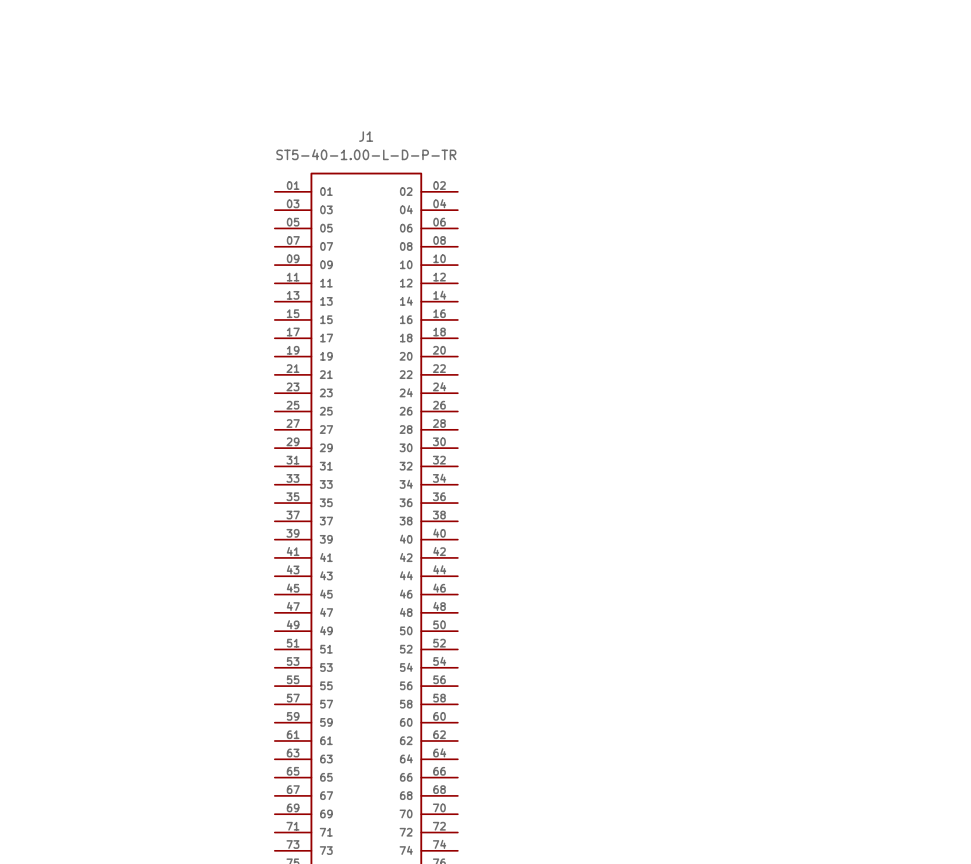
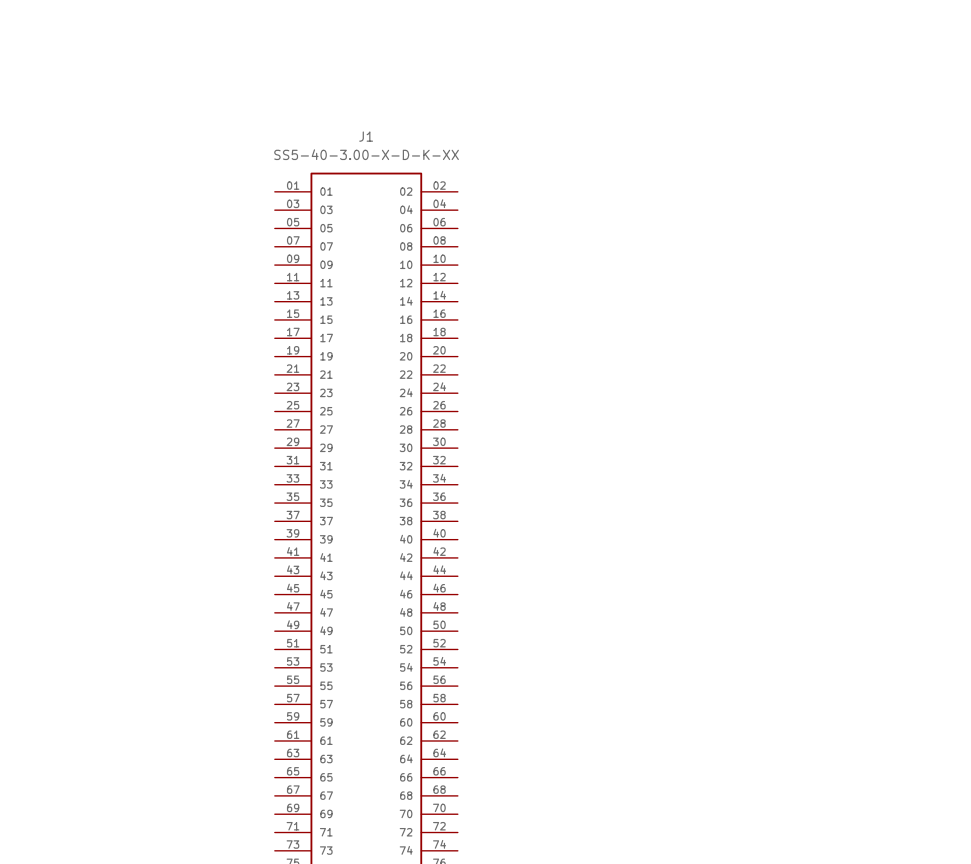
J1 value: ST5-40-1.00-L-D-P-TR (366, 154) -> SS5-40-3.00-X-D-K-XX (366, 154)

